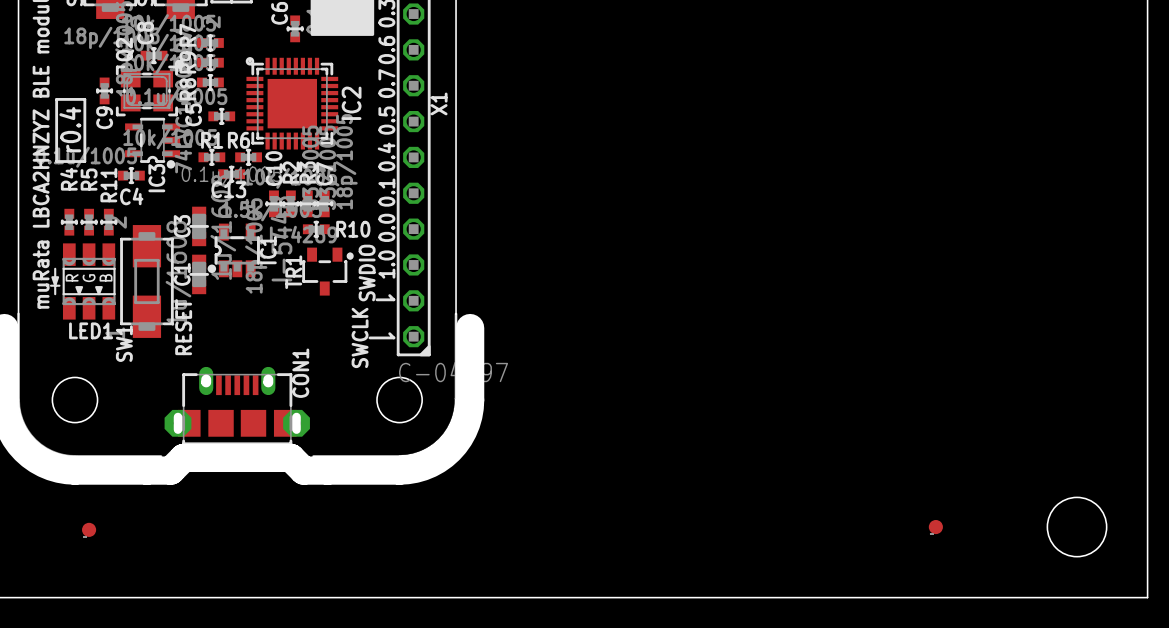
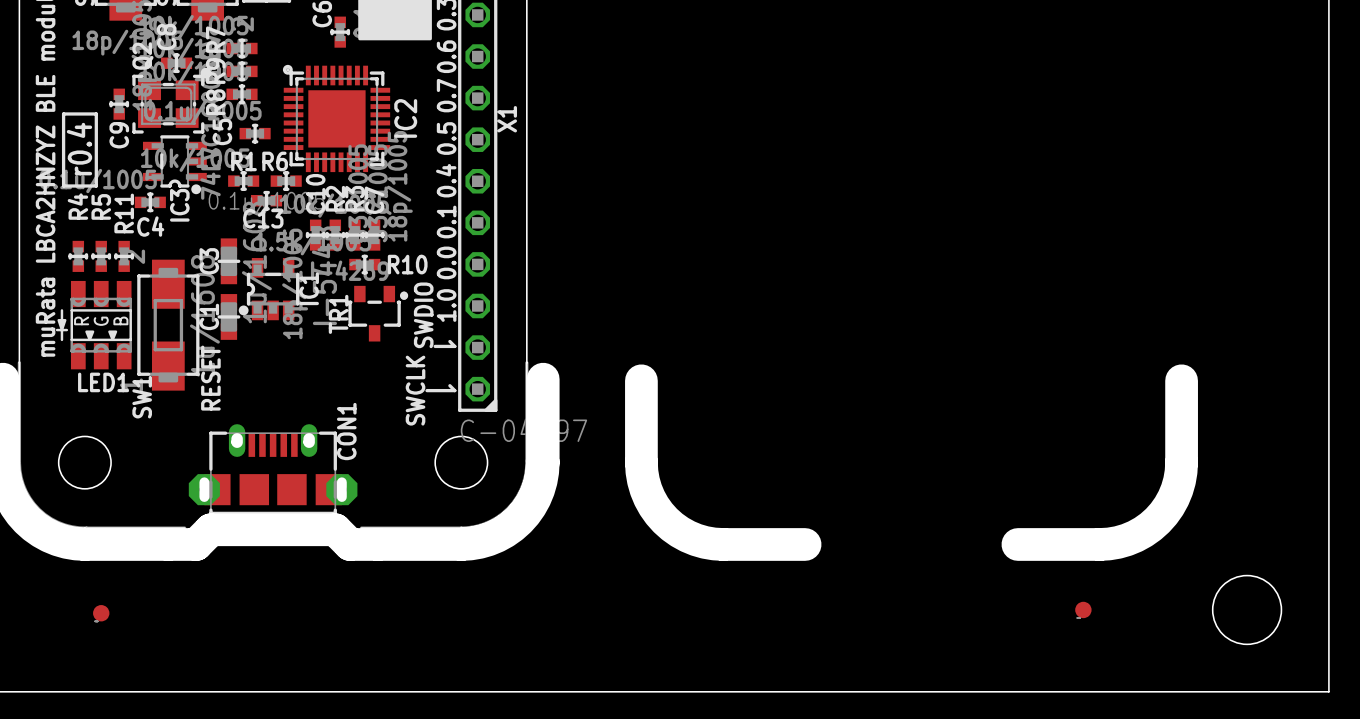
board edge: none -> (641, 380) (641, 462) (643, 480) (653, 506) (665, 520) (679, 531) (705, 542) (723, 544) (805, 544)
board edge: none -> (1181, 380) (1181, 462) (1179, 480) (1169, 506) (1157, 520) (1143, 531) (1117, 542) (1099, 544) (1017, 544)

